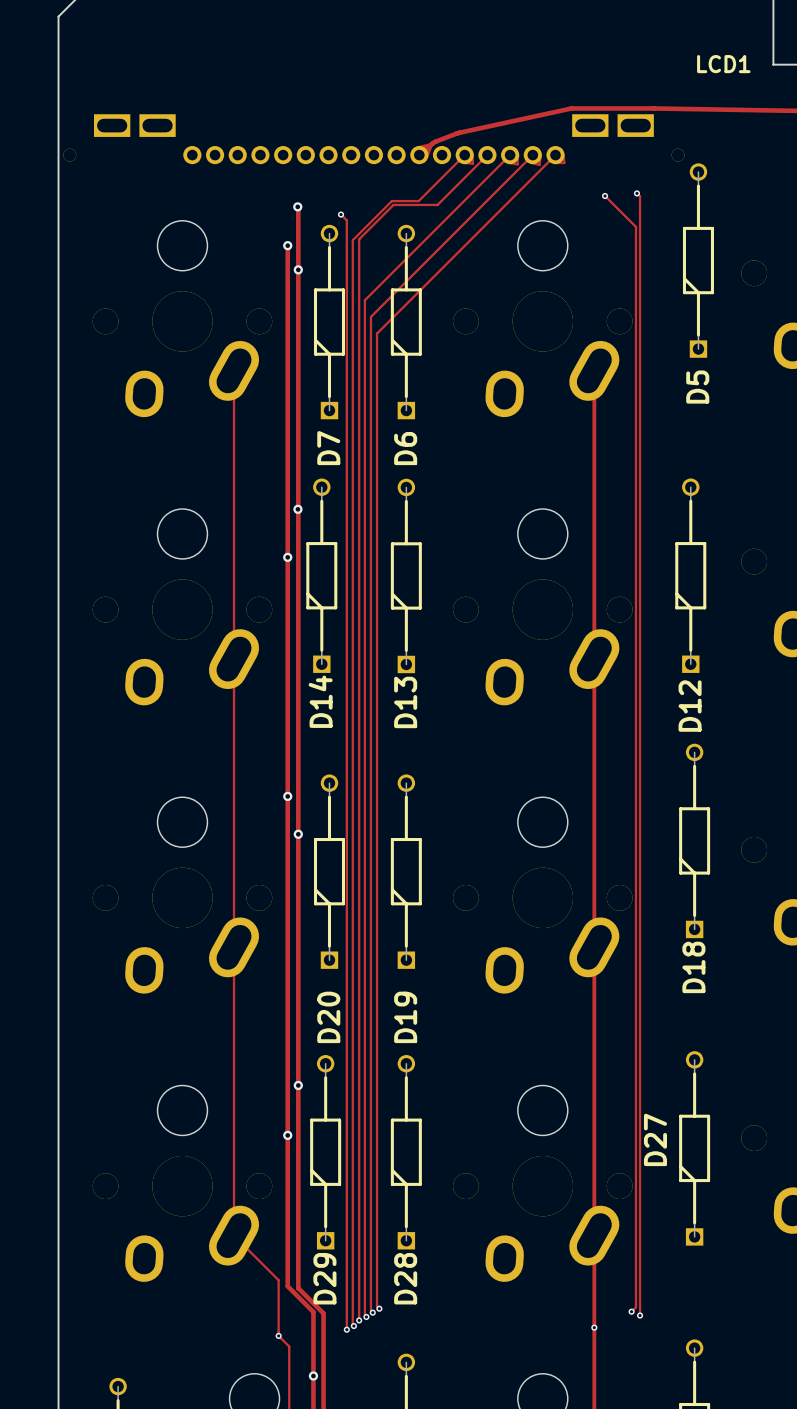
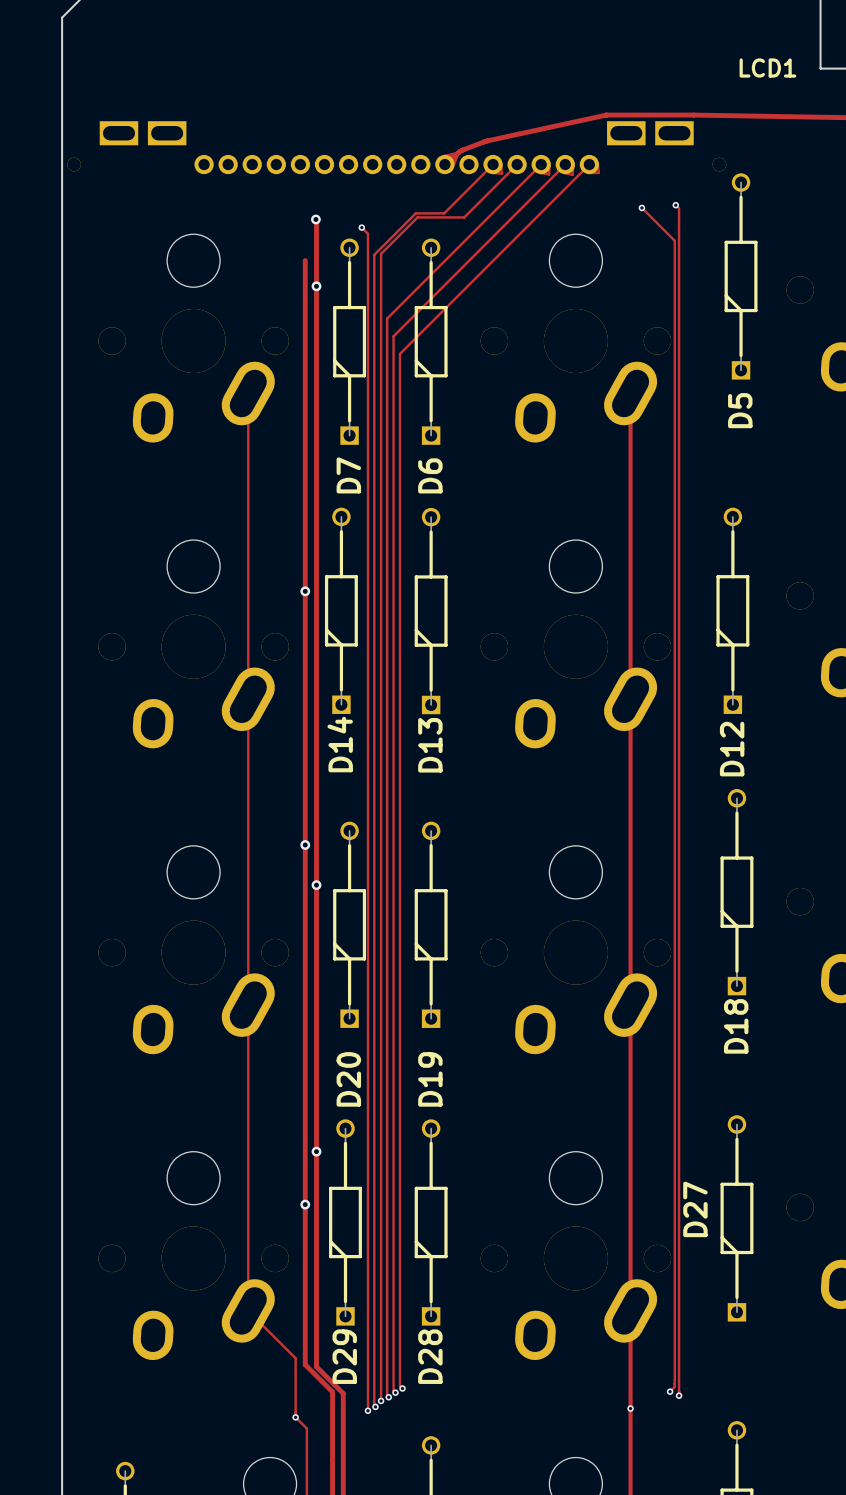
via: (287, 245) -> none
via: (297, 509) -> none
via: (313, 1375) -> none

